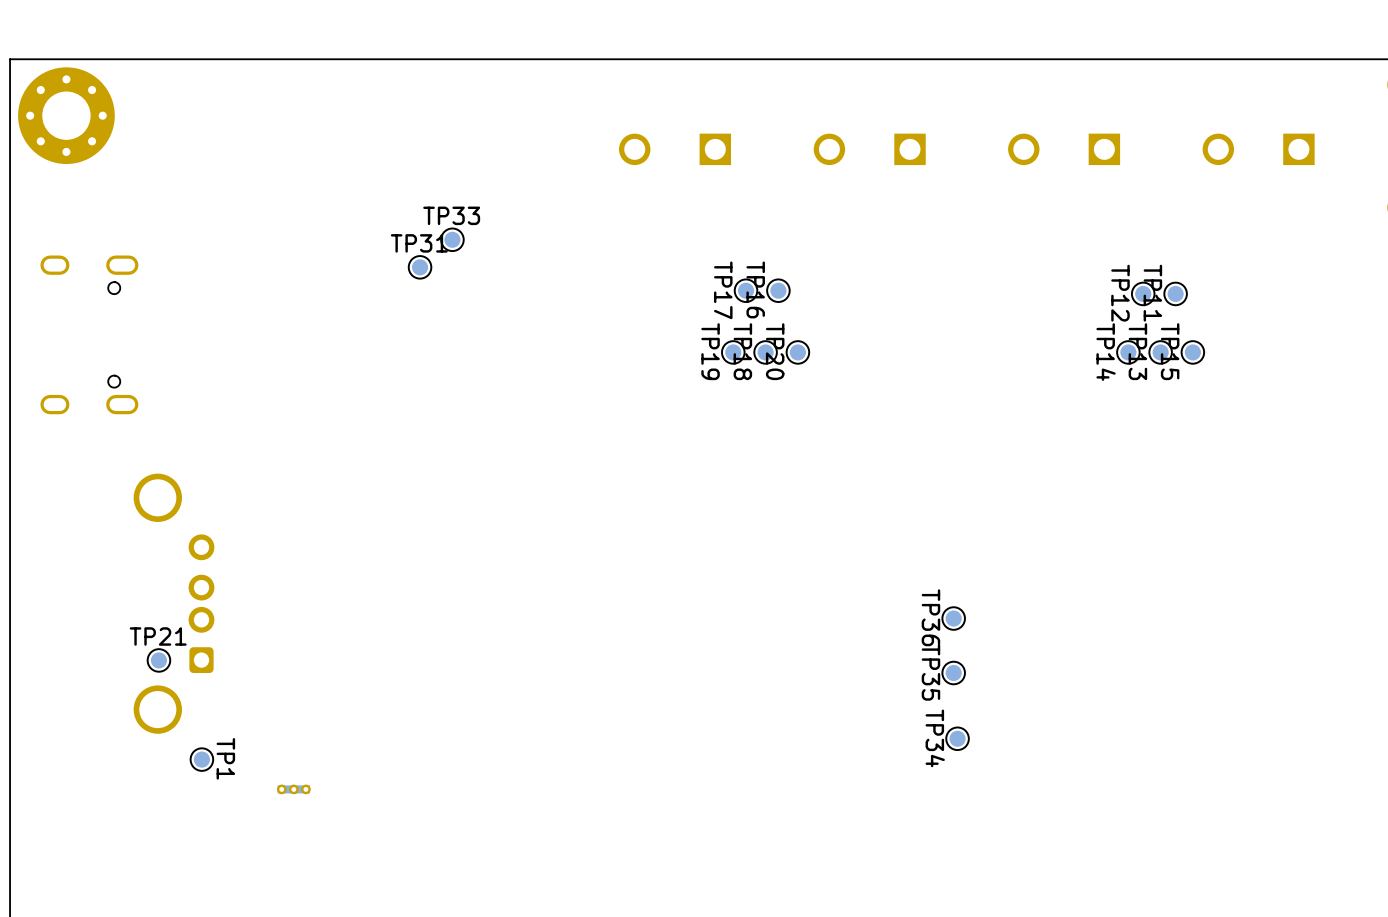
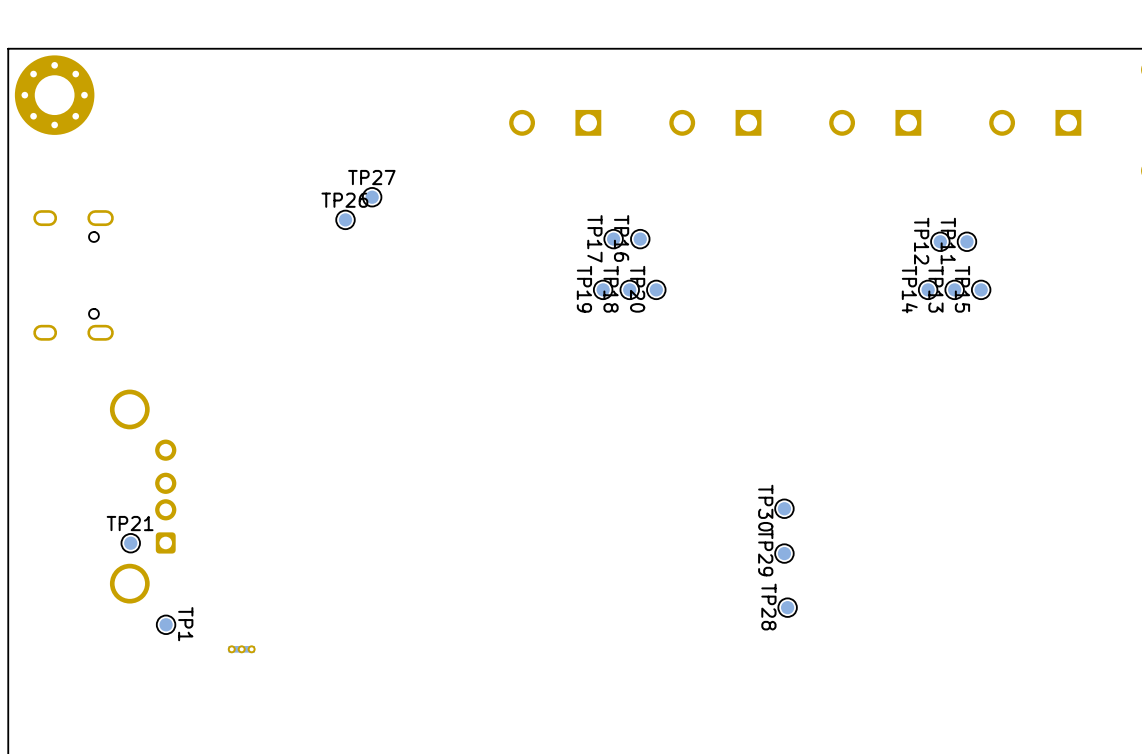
TP33 name: TP33 (451, 215) -> TP27 (371, 177)
TP31 name: TP31 (419, 243) -> TP26 (344, 200)
TP36 name: TP36 (930, 617) -> TP30 (765, 508)
TP35 name: TP35 (930, 672) -> TP29 (765, 552)
TP34 name: TP34 (935, 738) -> TP28 (768, 607)

